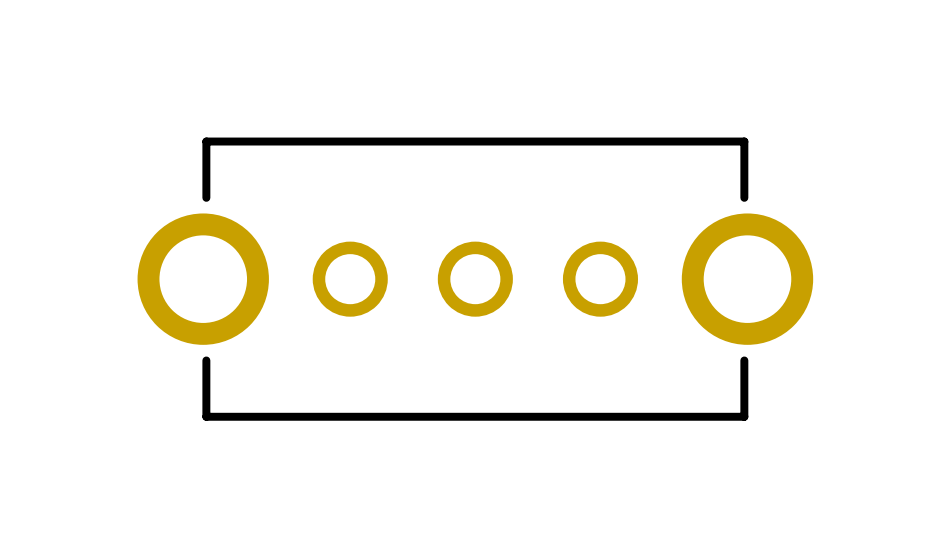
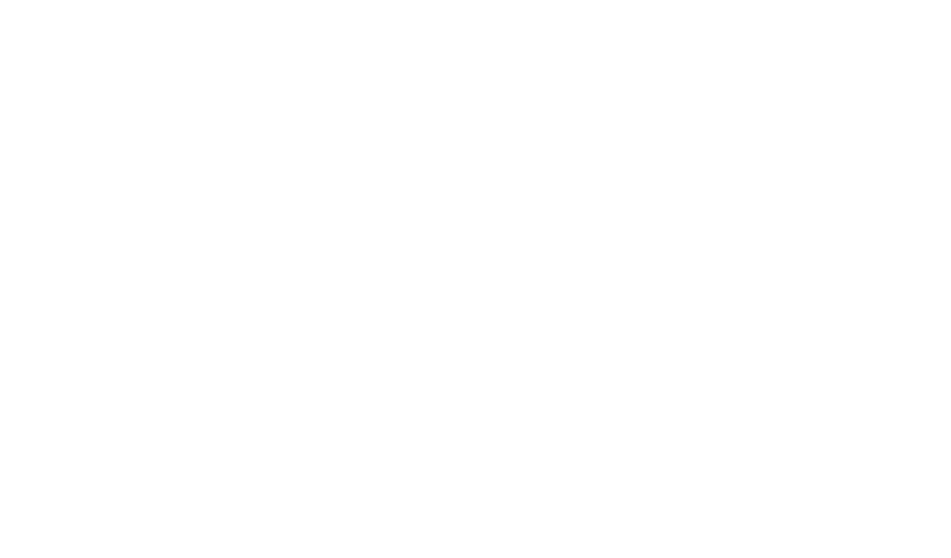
part: (475, 279) -> none

